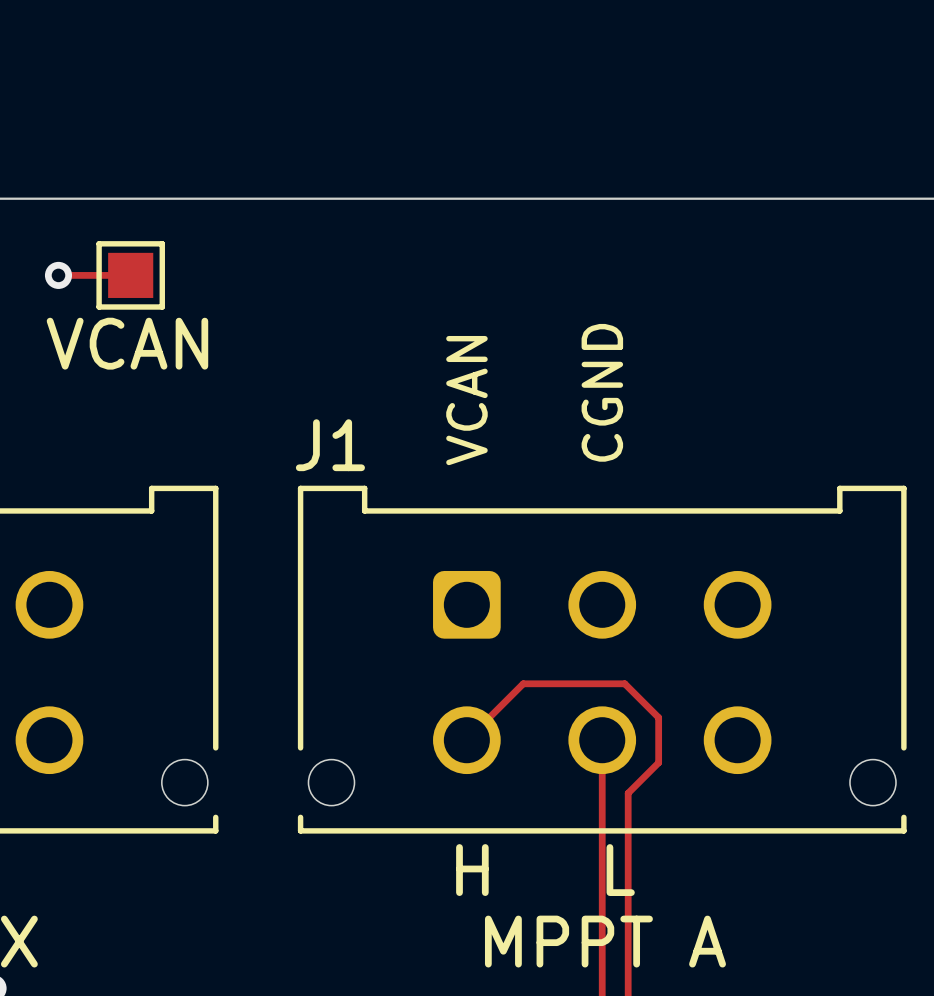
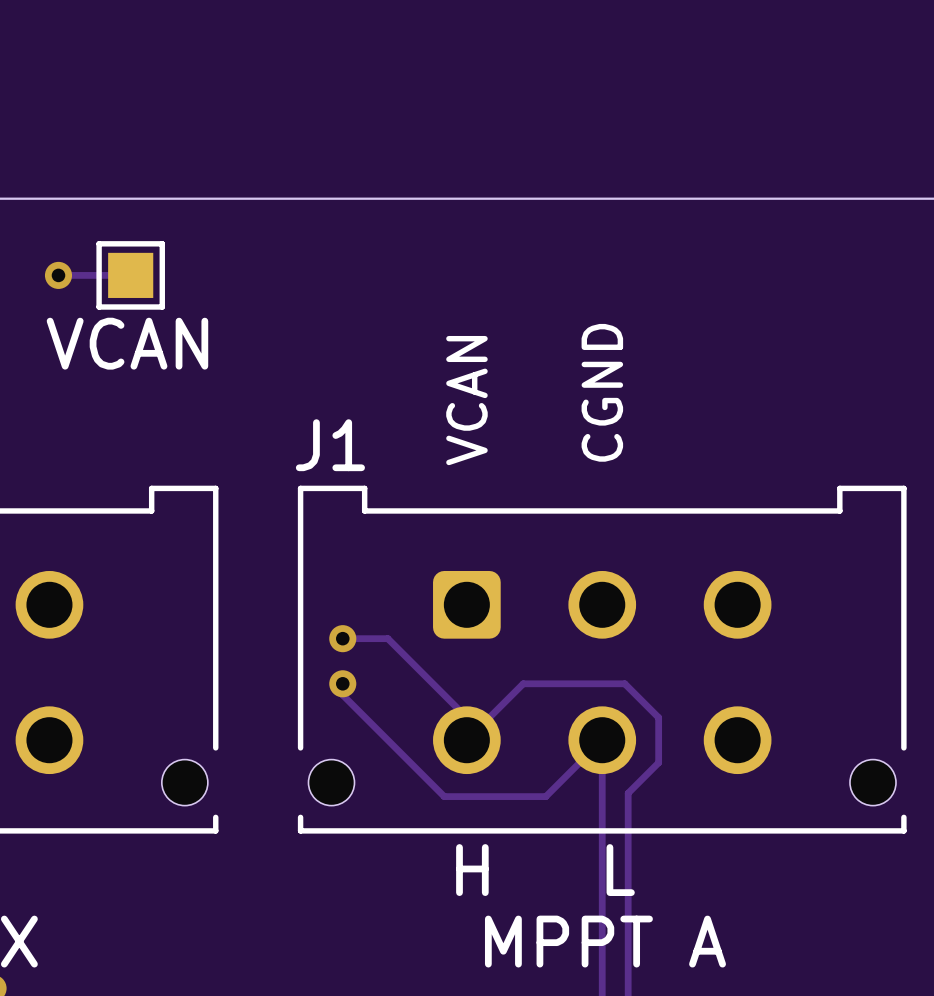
track: none -> (342, 638) (387, 638) (466, 717) (466, 740)
via: none -> (342, 638)
track: none -> (342, 683) (342, 695) (444, 796) (545, 796) (602, 740)
via: none -> (342, 683)

